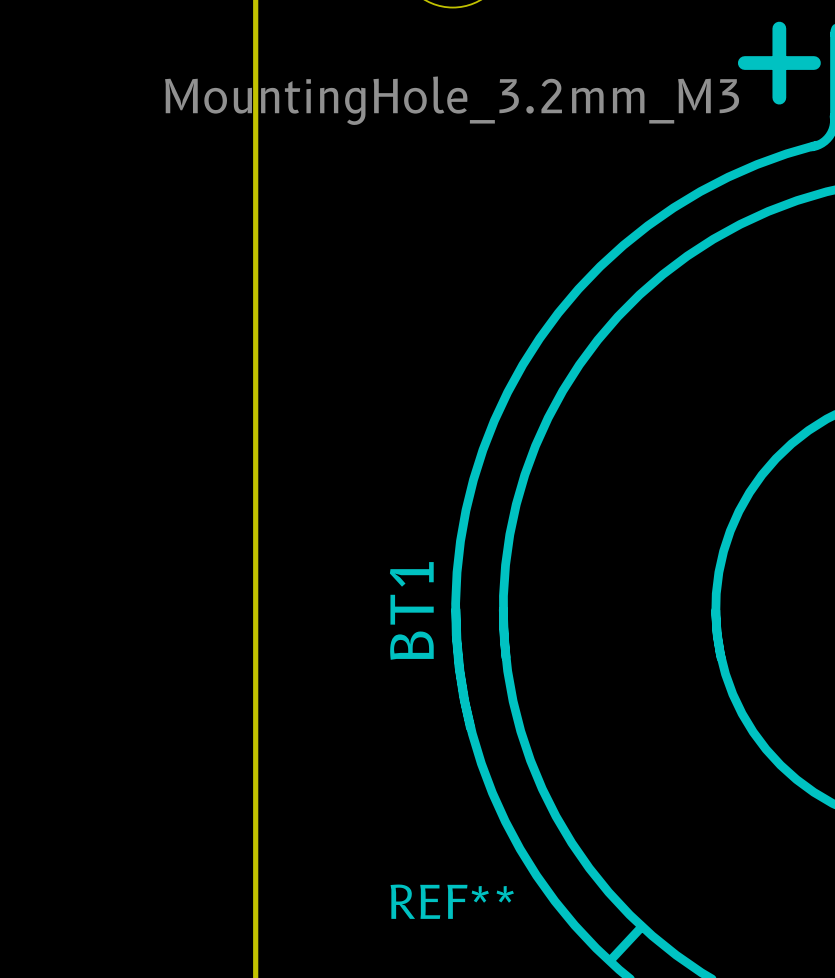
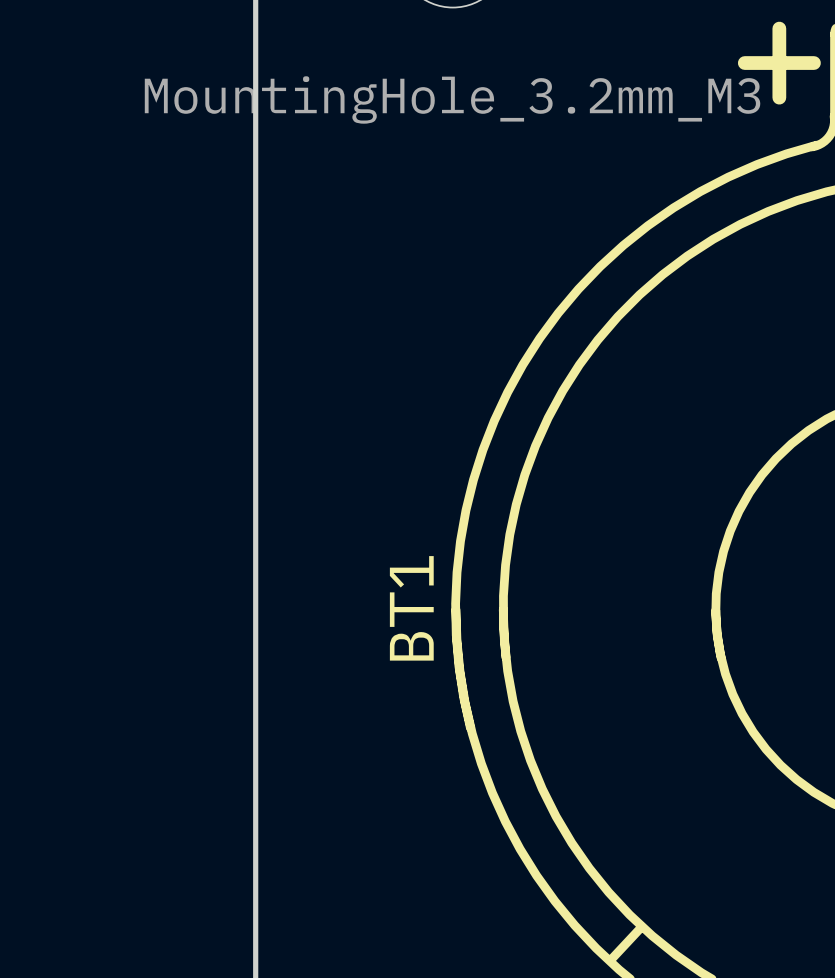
REF** name: REF** (452, 901) -> none

